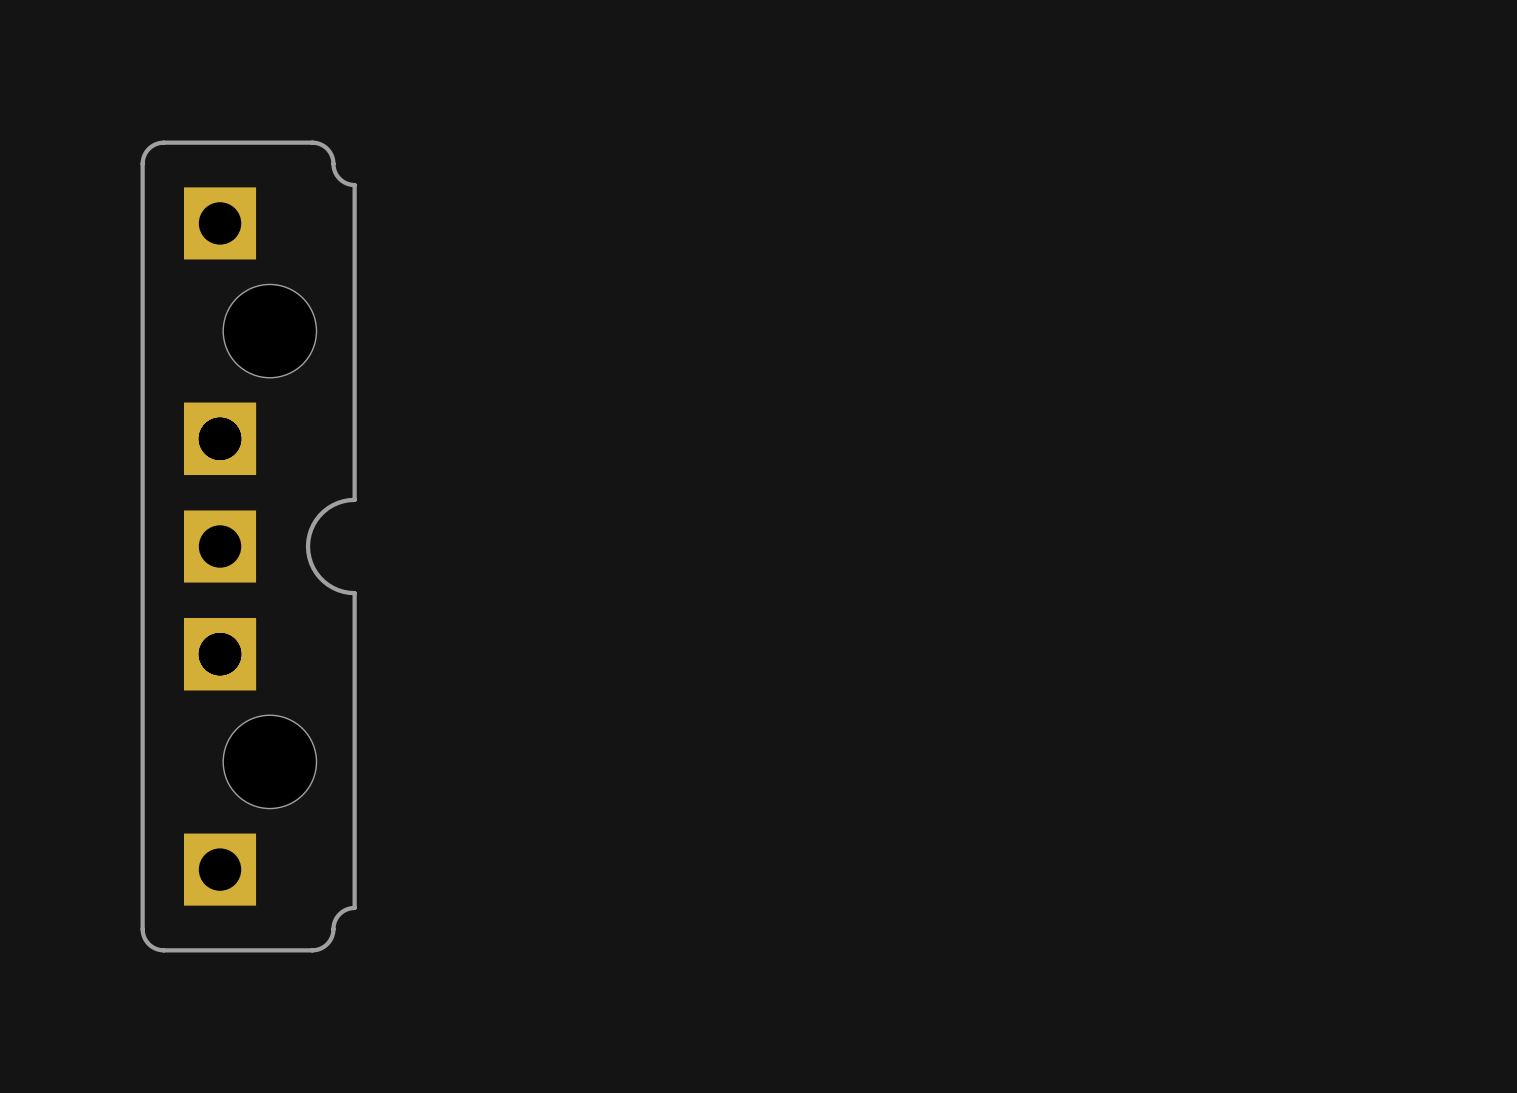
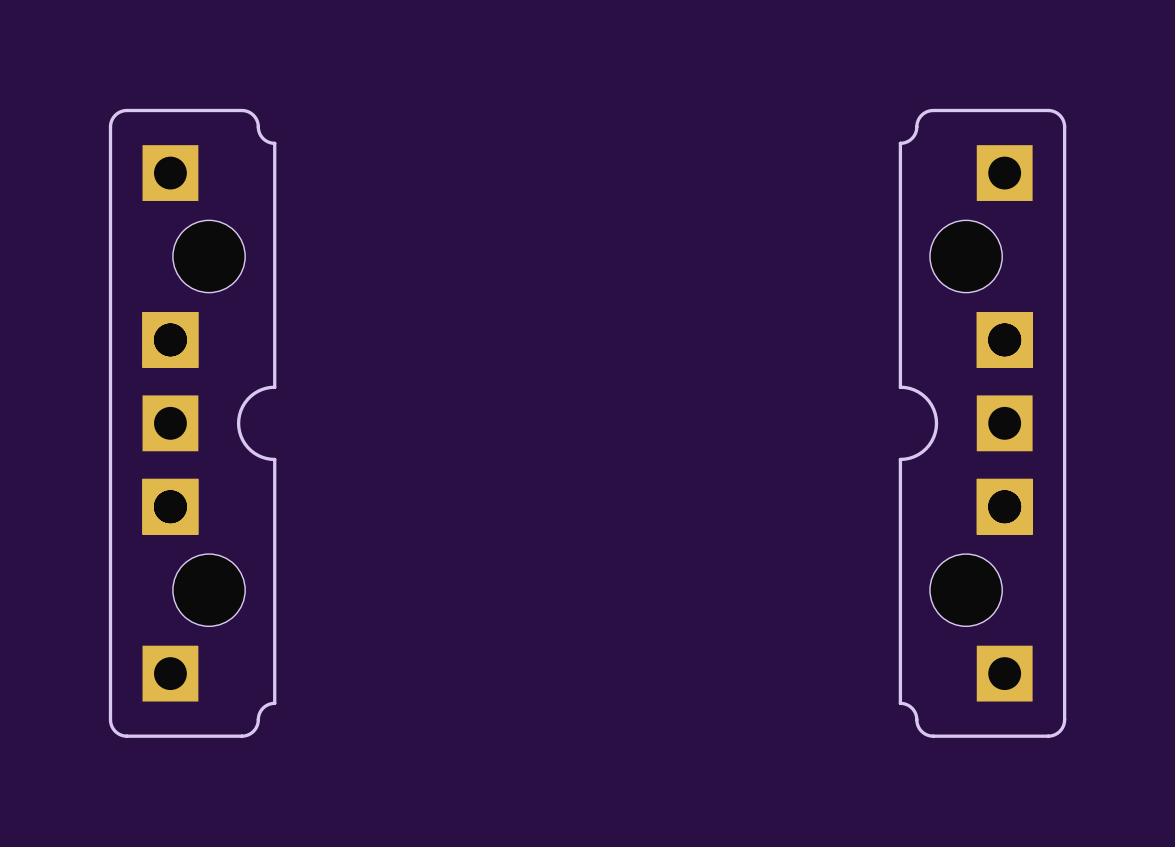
board edge: none -> (933, 110) (1050, 110) (1059, 115) (1064, 124) (1064, 719) (1059, 731) (1050, 736) (929, 735) (919, 727) (915, 713) (912, 708) (900, 703) (900, 459) (914, 456) (925, 448) (933, 437) (936, 423) (933, 409) (925, 397) (914, 389) (900, 387) (900, 143) (912, 138) (920, 116) (925, 112) (933, 110)
part: none -> (1004, 173)
part: none -> (966, 256)
part: none -> (1004, 339)
part: none -> (1004, 423)
part: none -> (1004, 506)
part: none -> (966, 590)
part: none -> (1004, 673)

